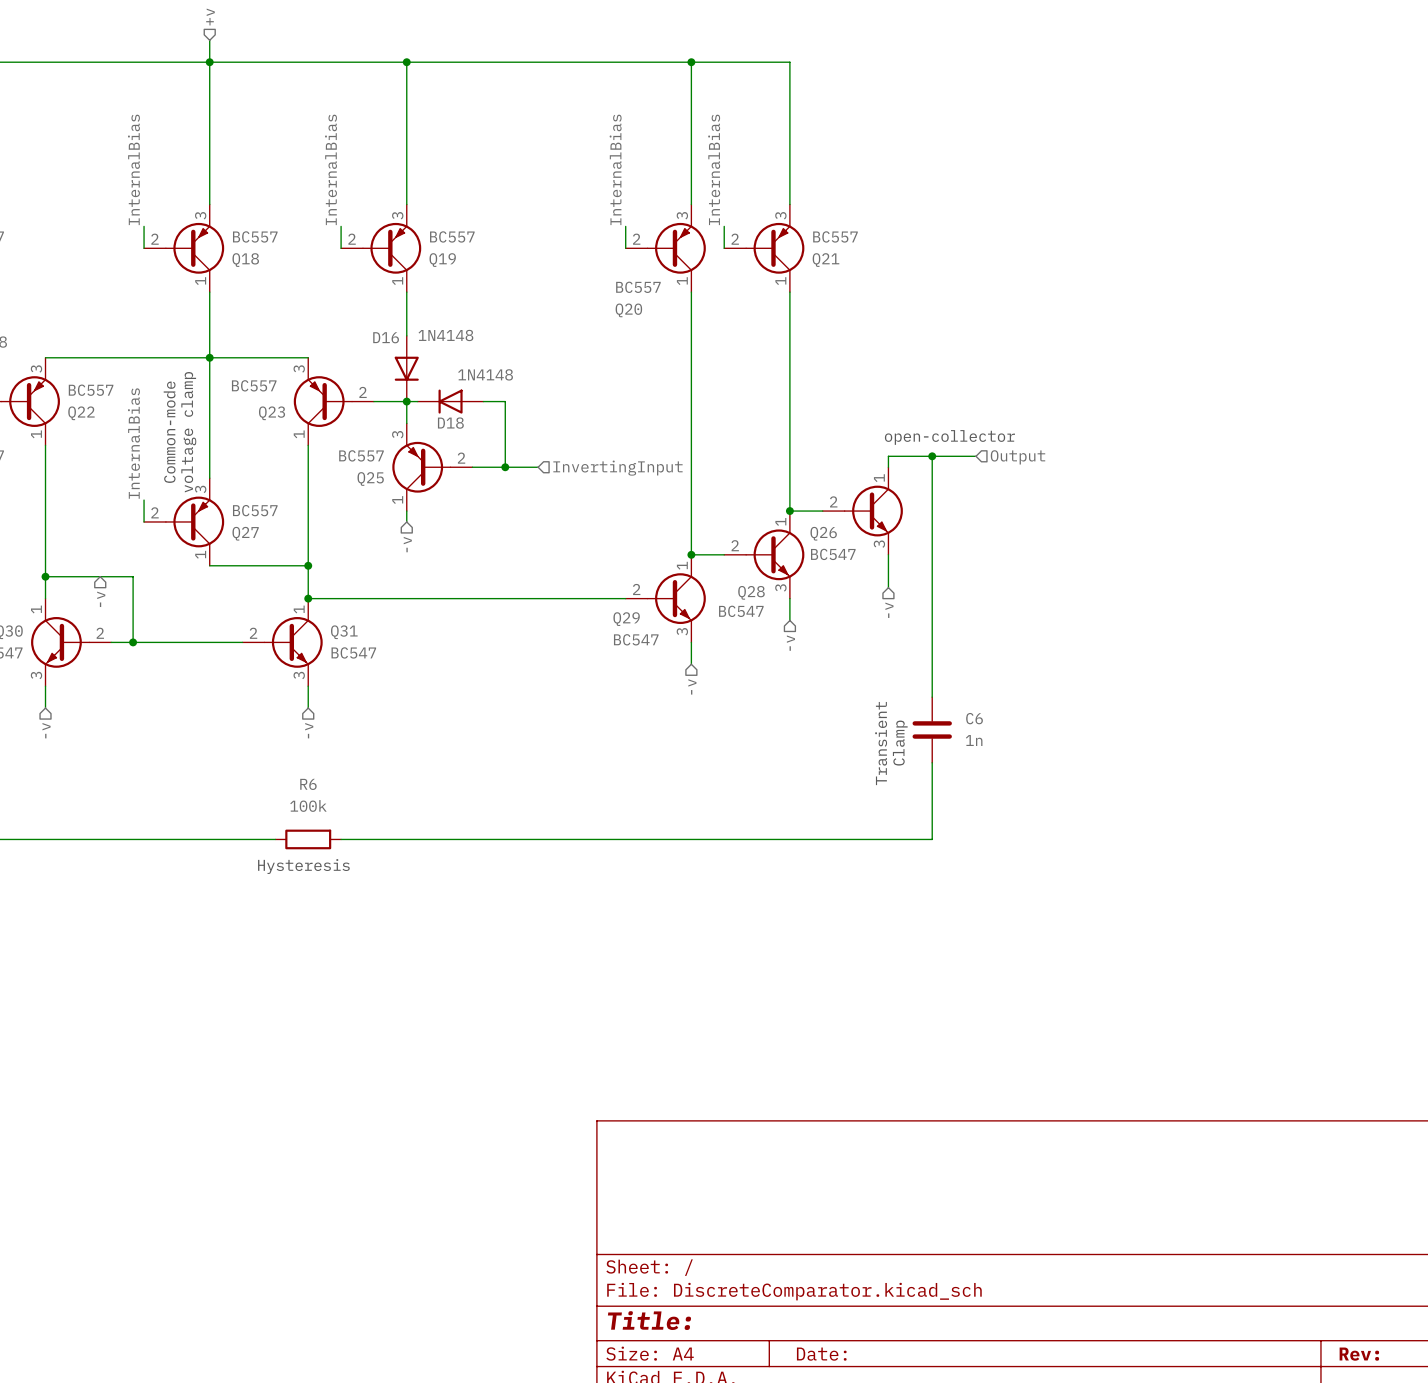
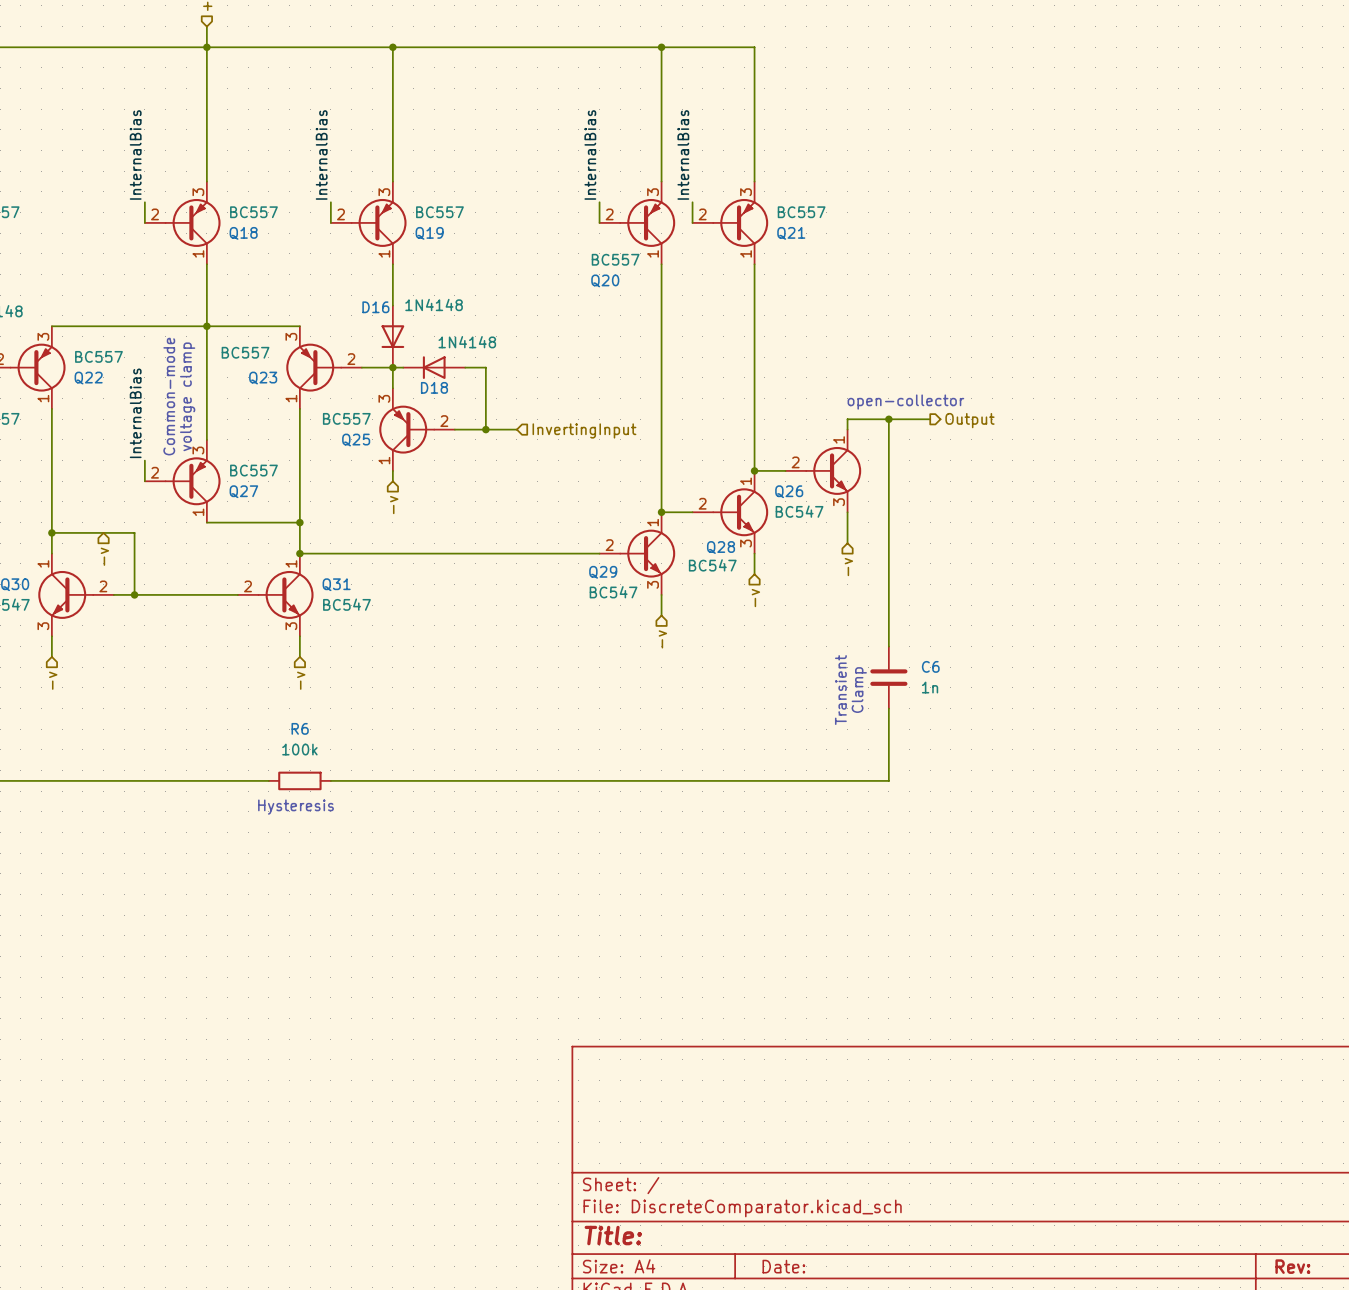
hierarchical label shape: input (1018, 457) -> output (969, 420)

